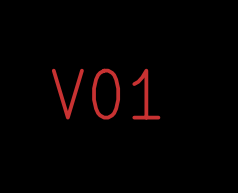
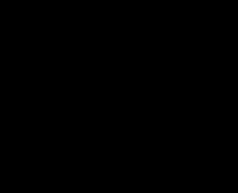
text: V01 (106, 94) -> none

